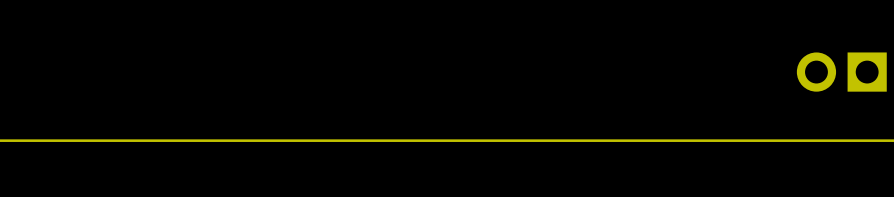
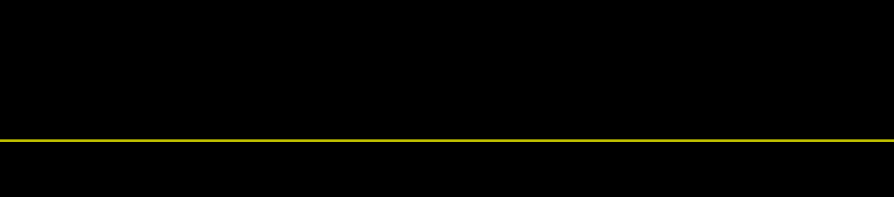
part: (841, 72) -> none

